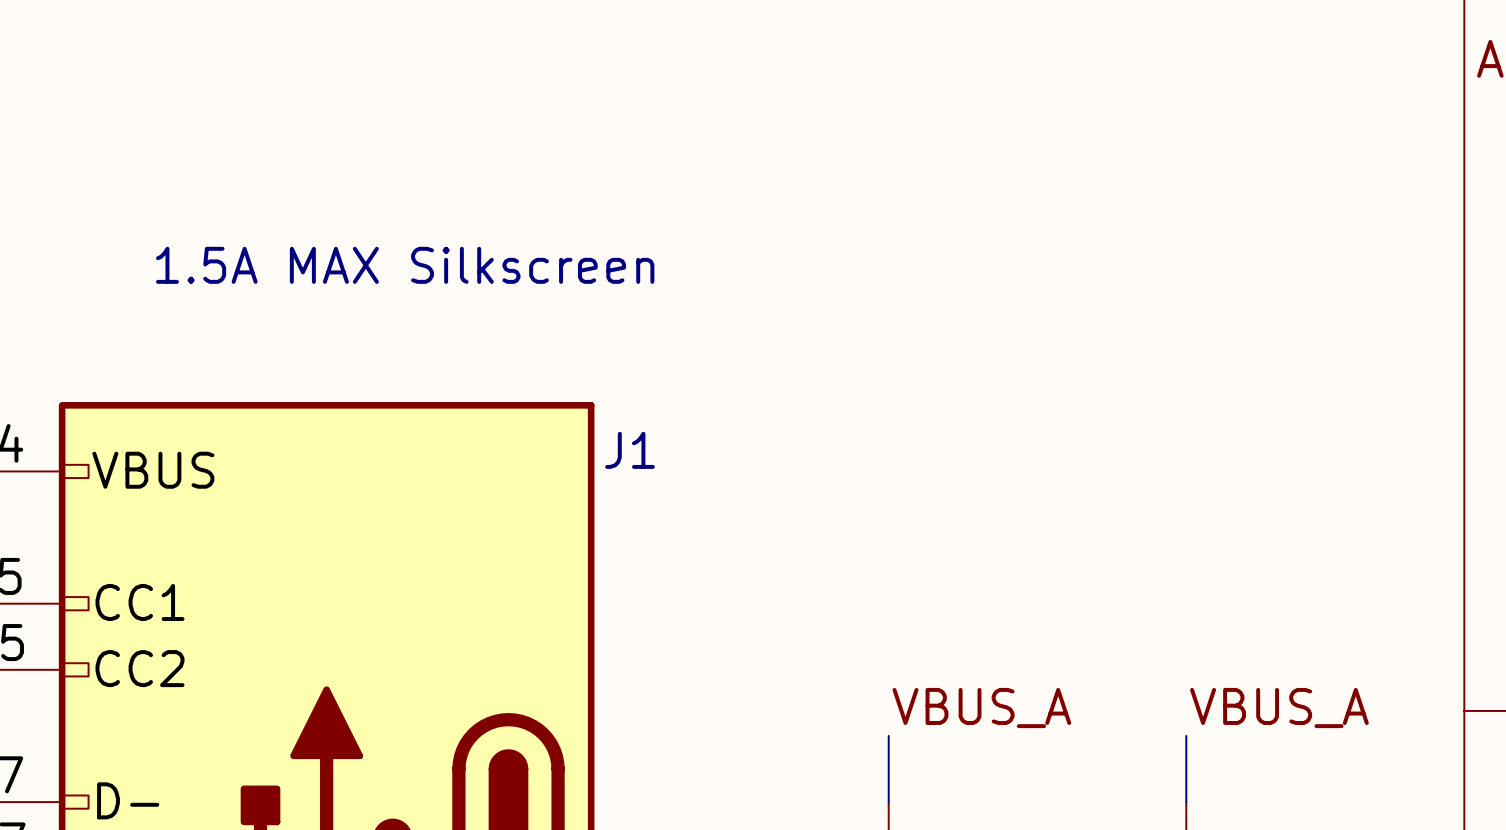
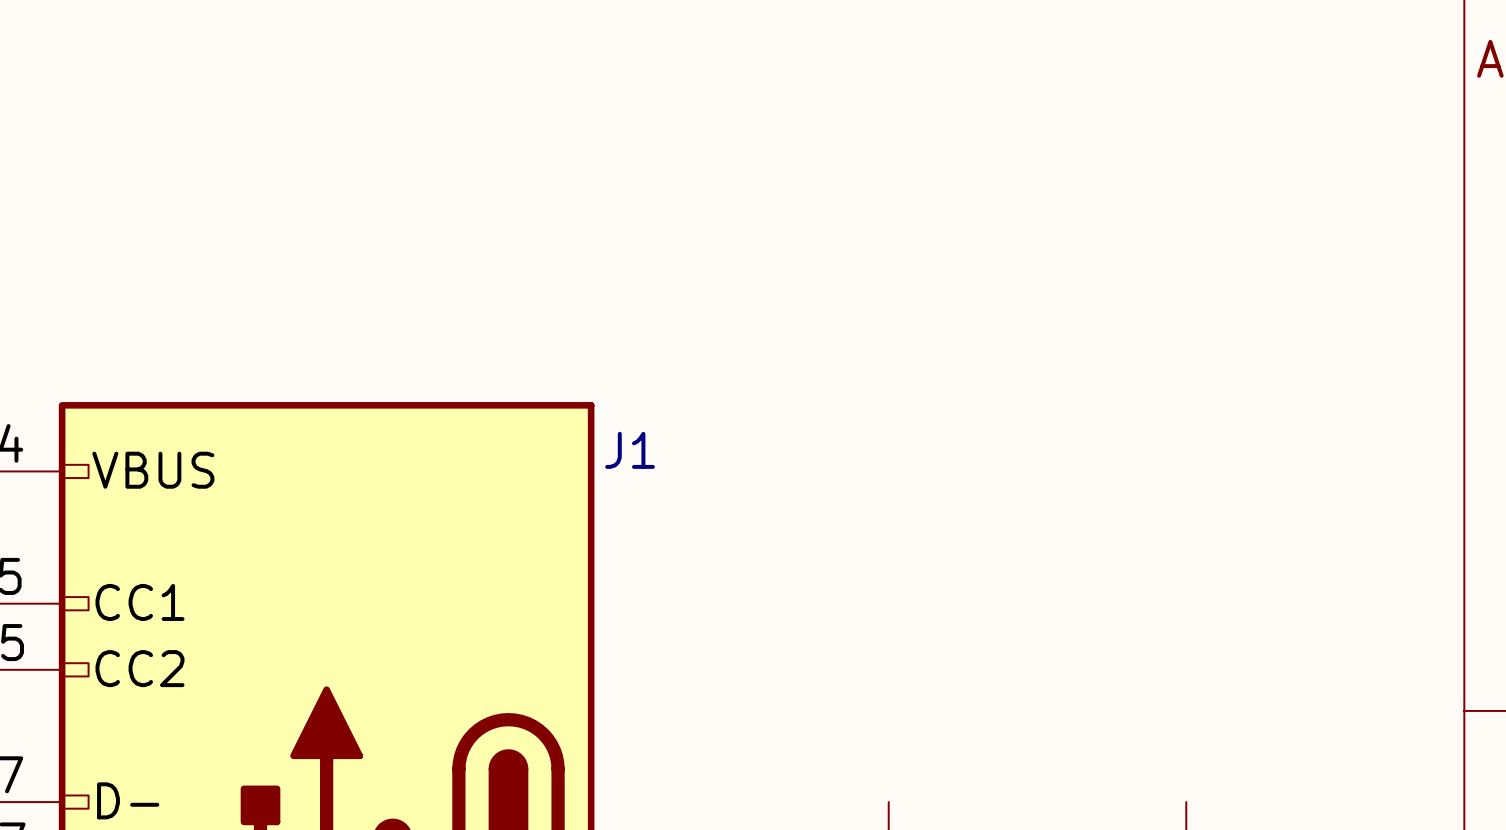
text: 1.5A MAX Silkscreen (405, 265) -> none
label: VBUS_A (981, 708) -> none
label: VBUS_A (1279, 708) -> none
wire: (888, 735) (888, 802) -> none
wire: (1186, 735) (1186, 802) -> none

